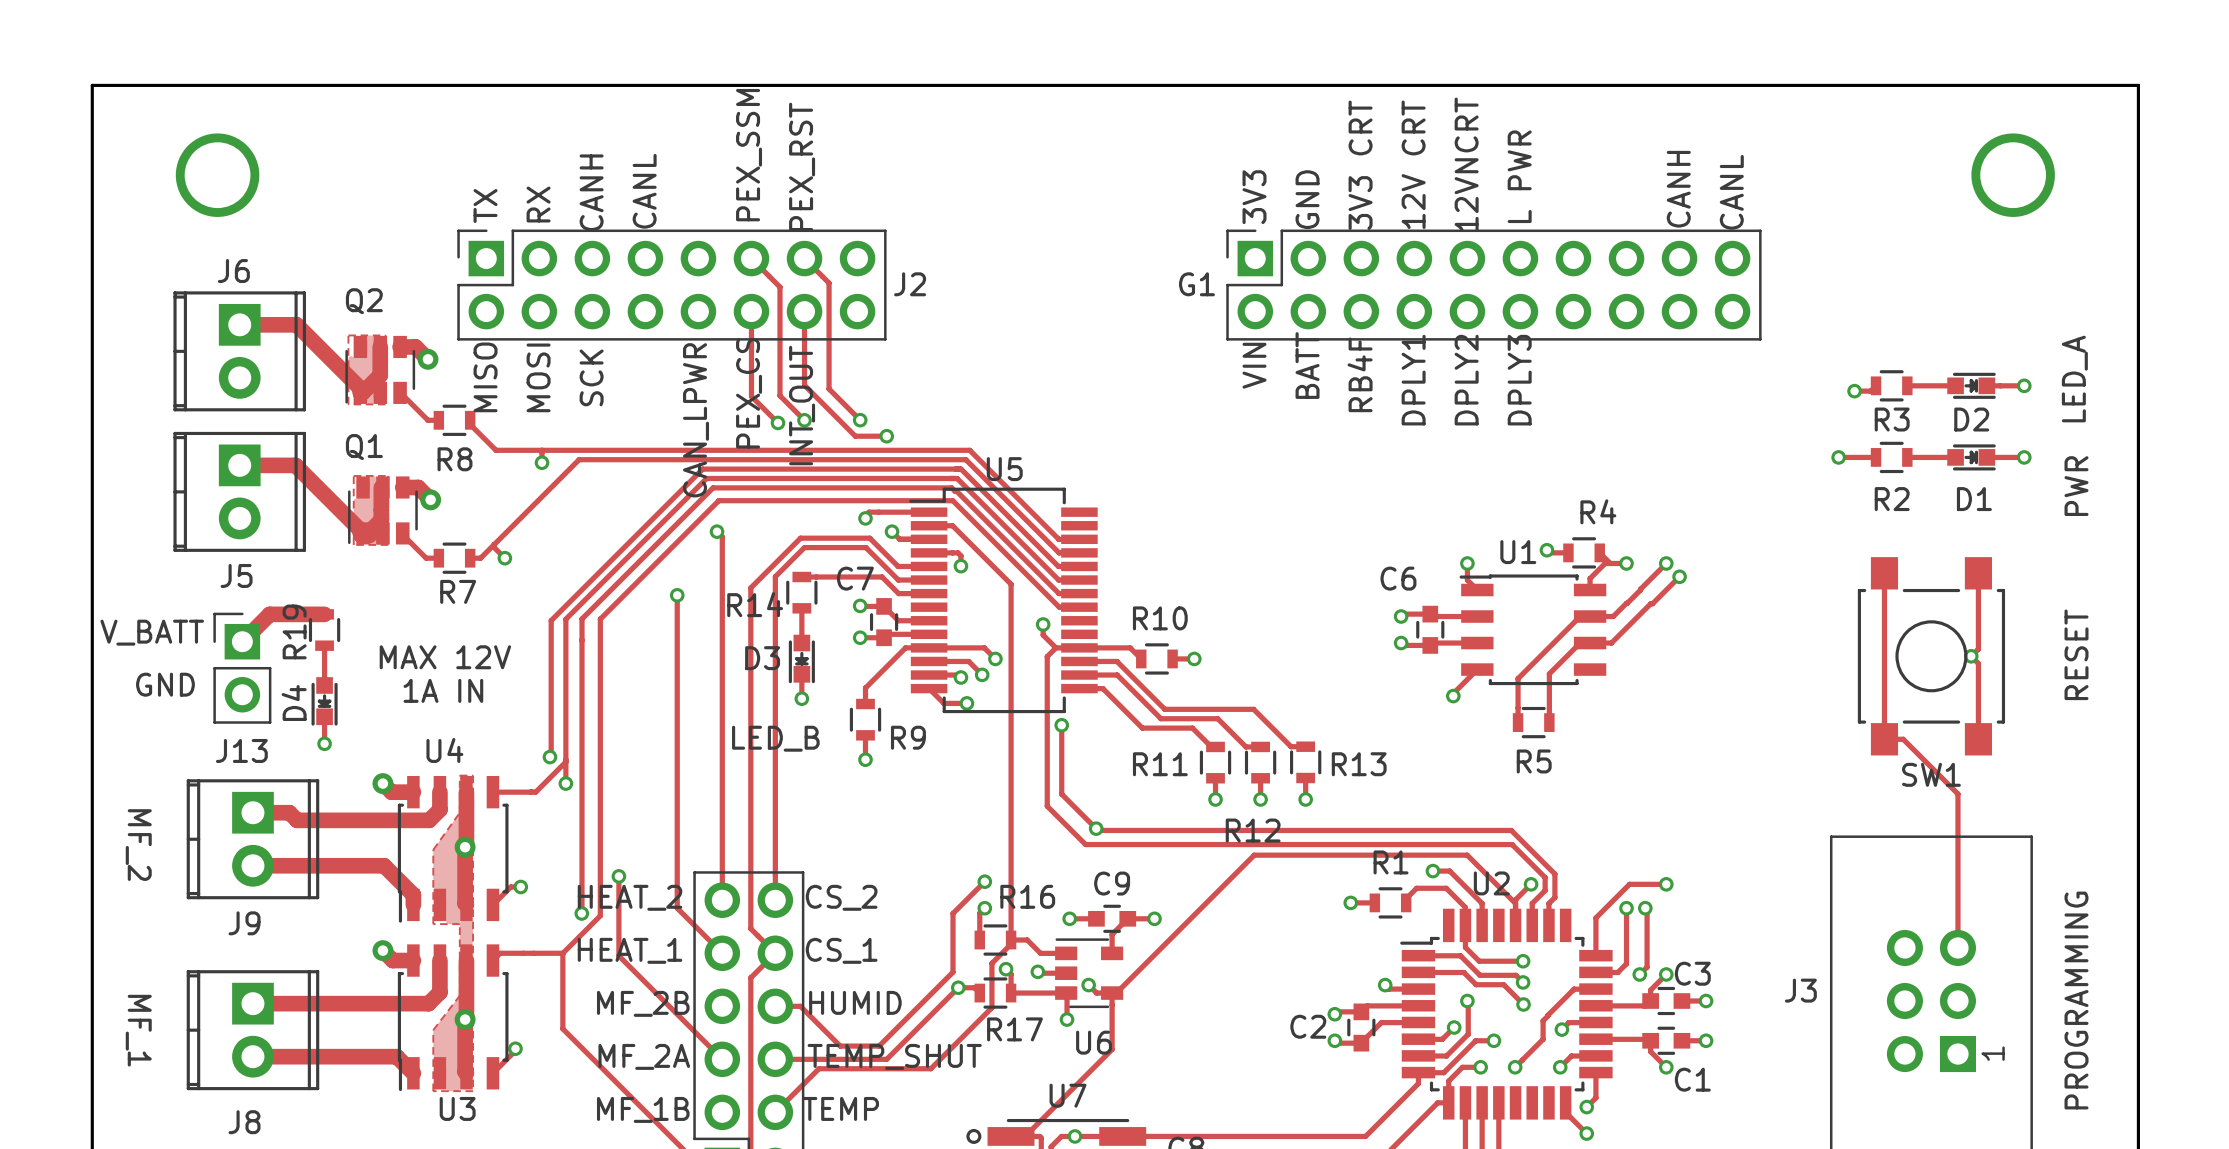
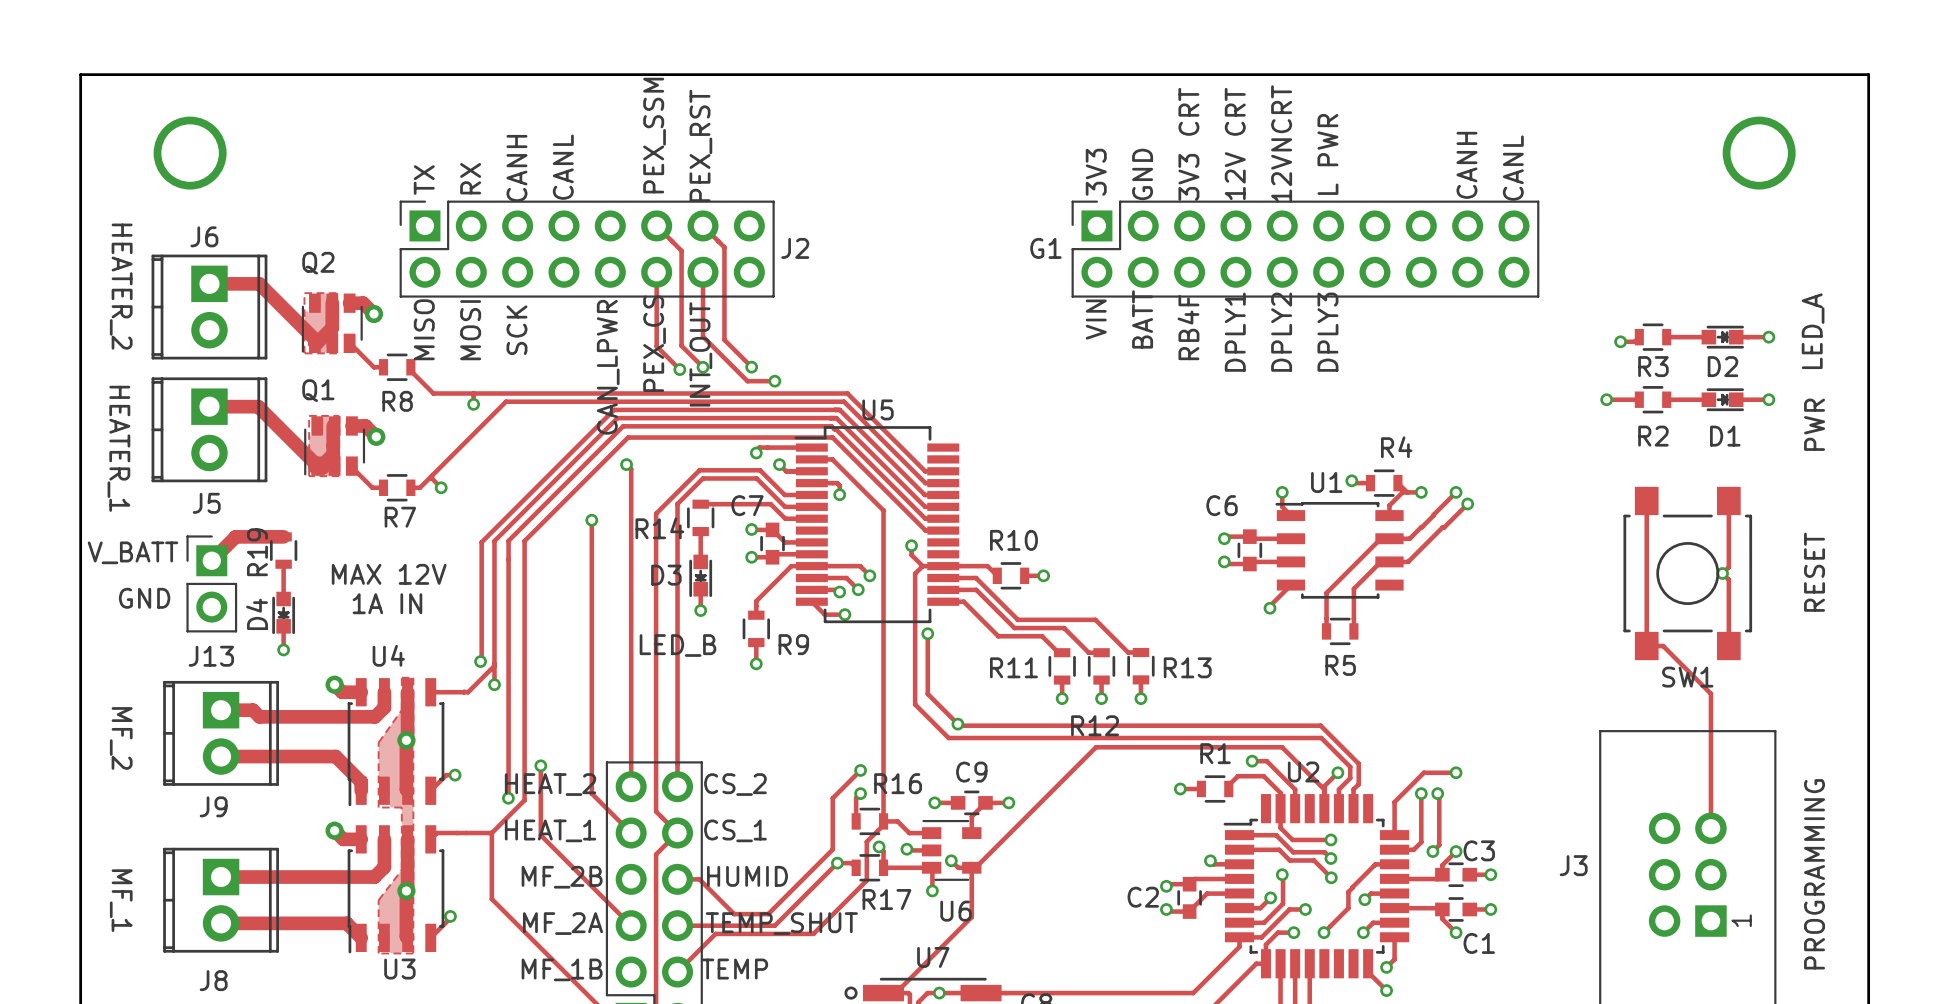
text: none -> HEATER_2 (121, 286)
text: none -> HEATER_1 (118, 448)

